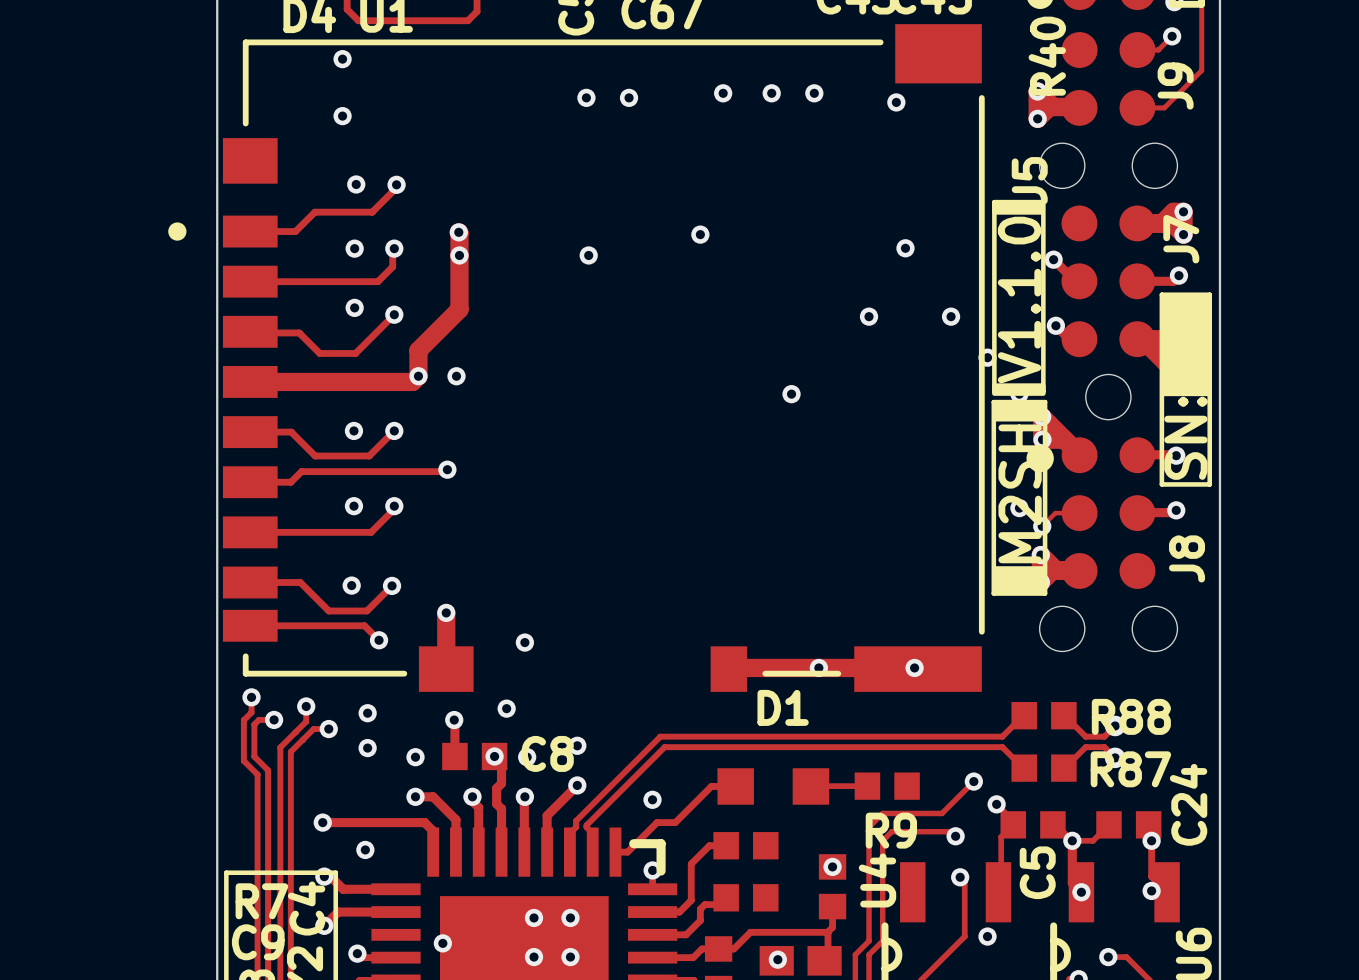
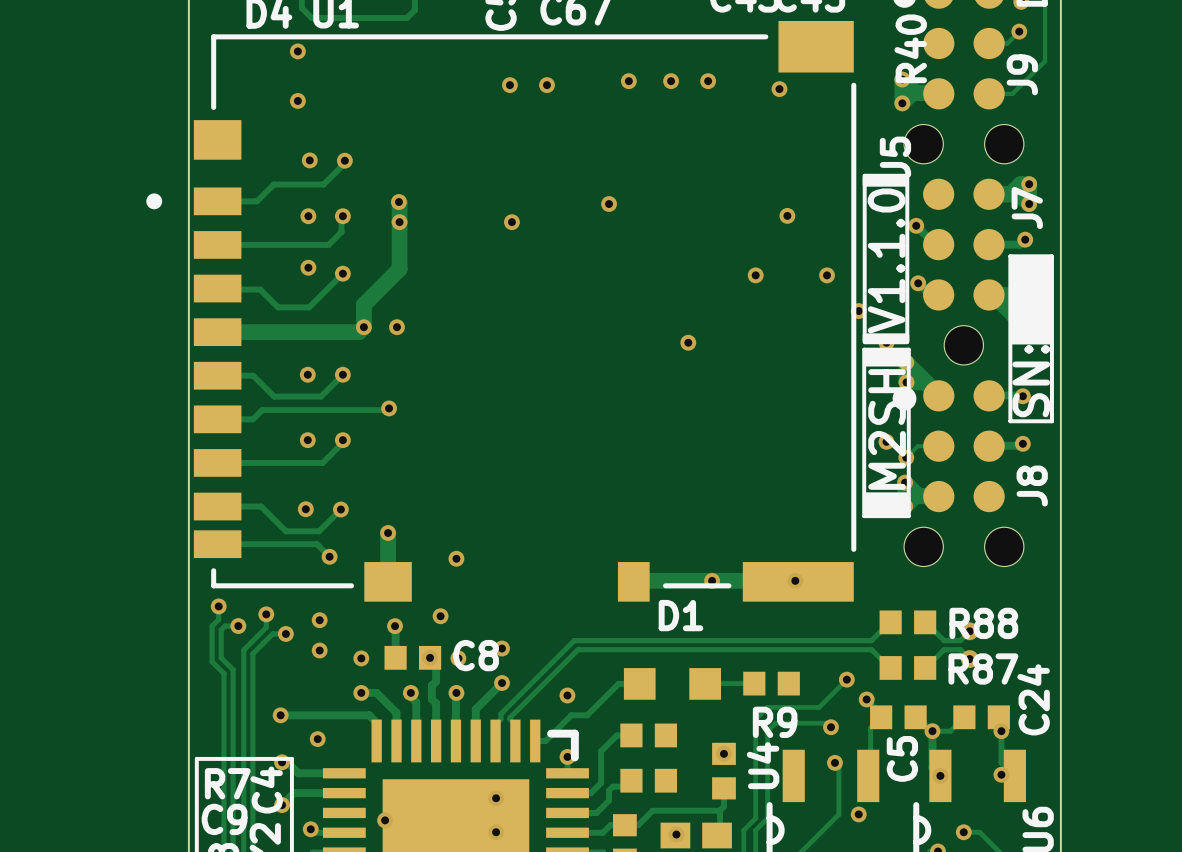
via: (534, 917) -> none
via: (534, 957) -> none

